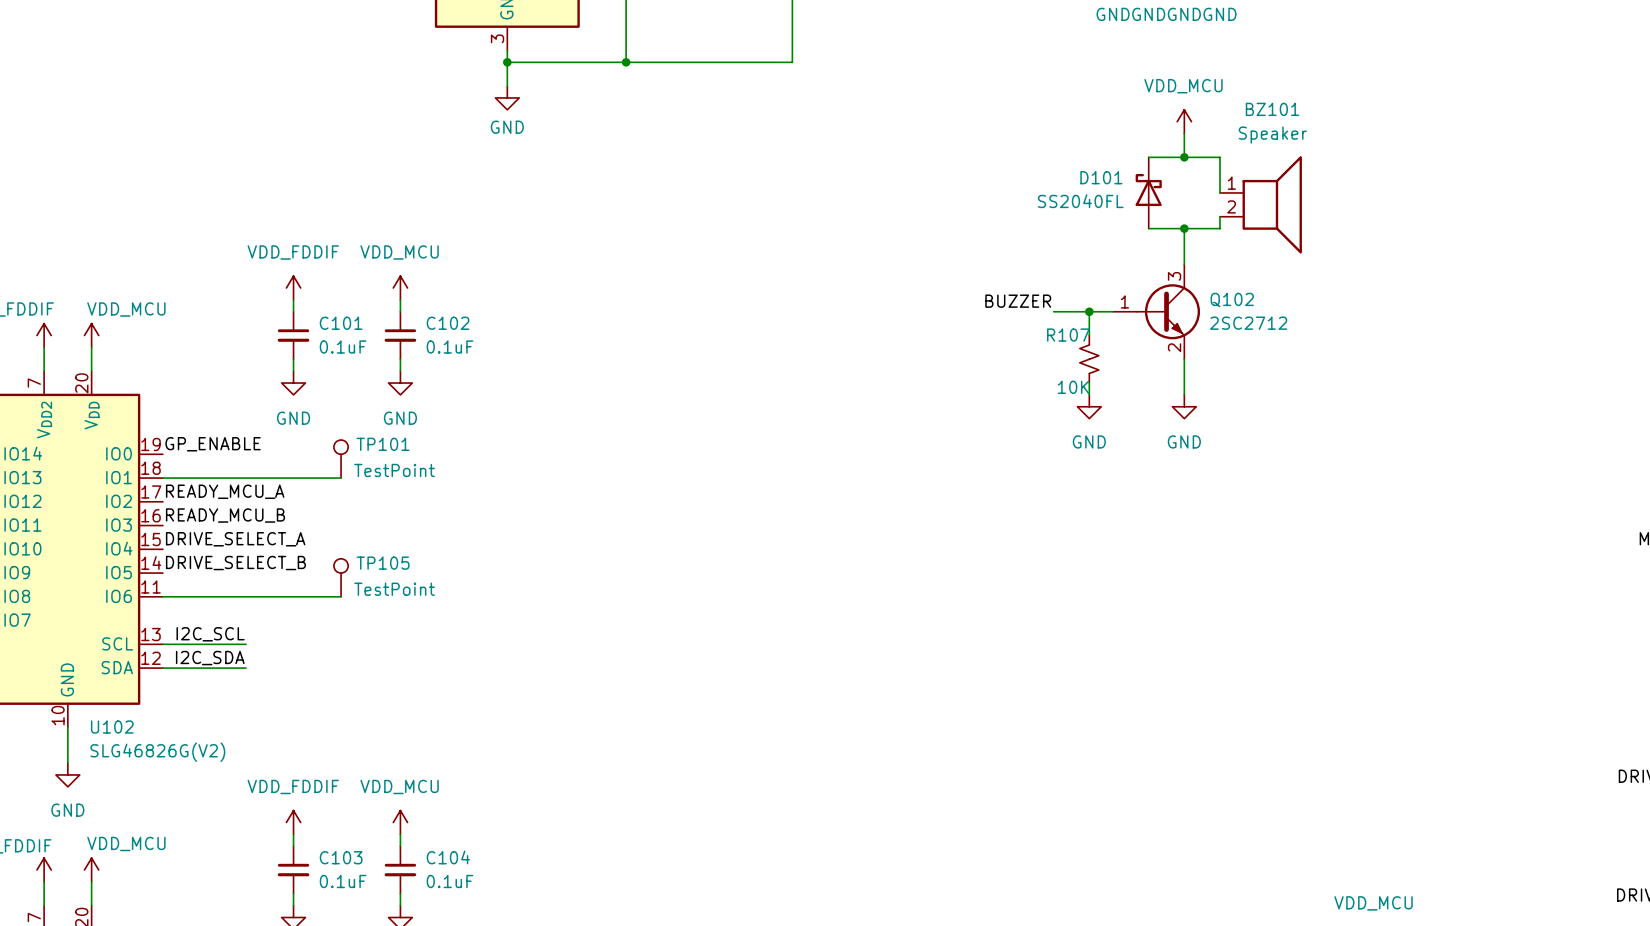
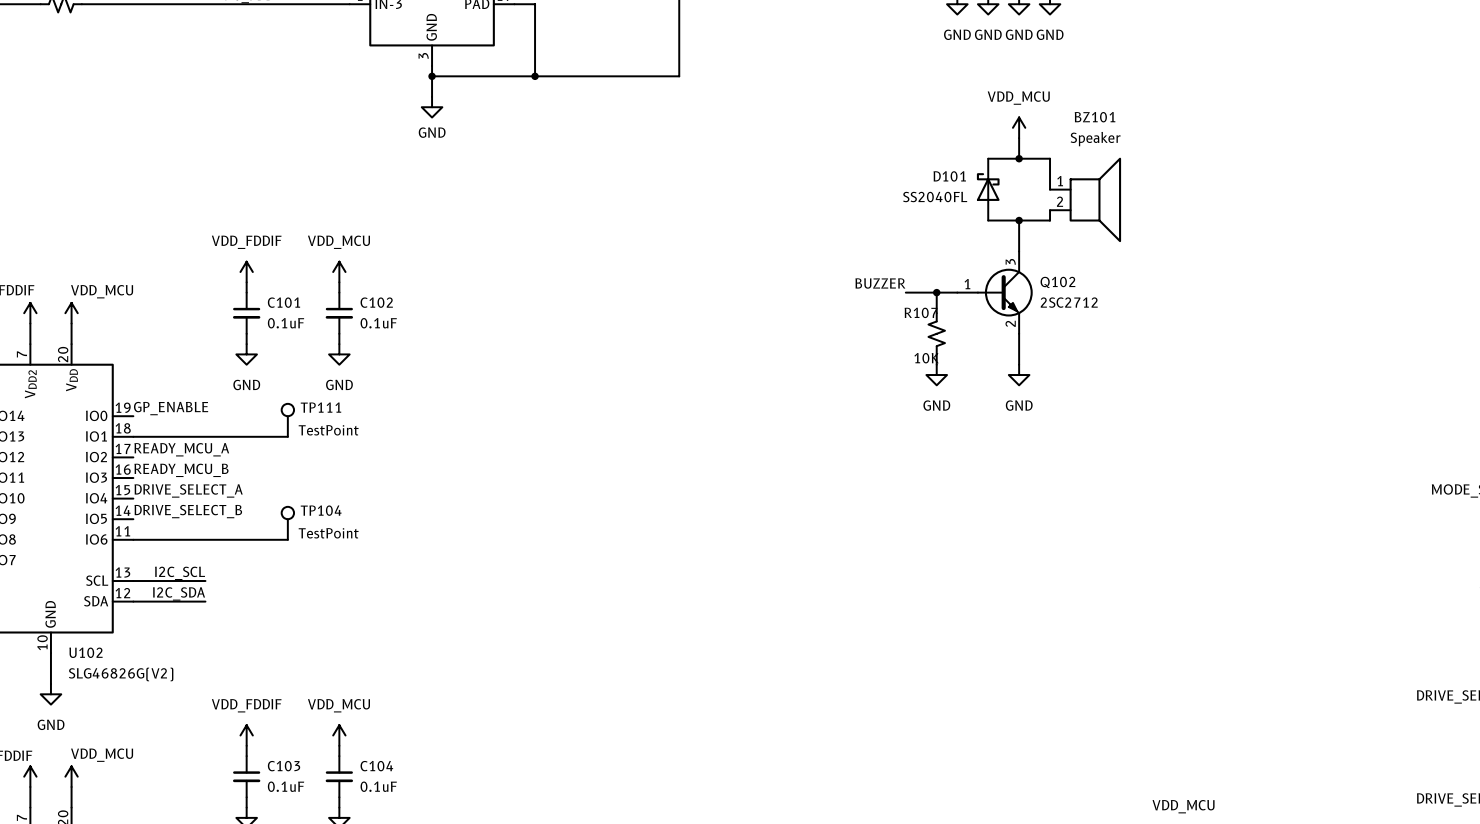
TP101 name: TP101 (383, 444) -> TP111 (320, 407)
TP105 name: TP105 (383, 563) -> TP104 (321, 510)

